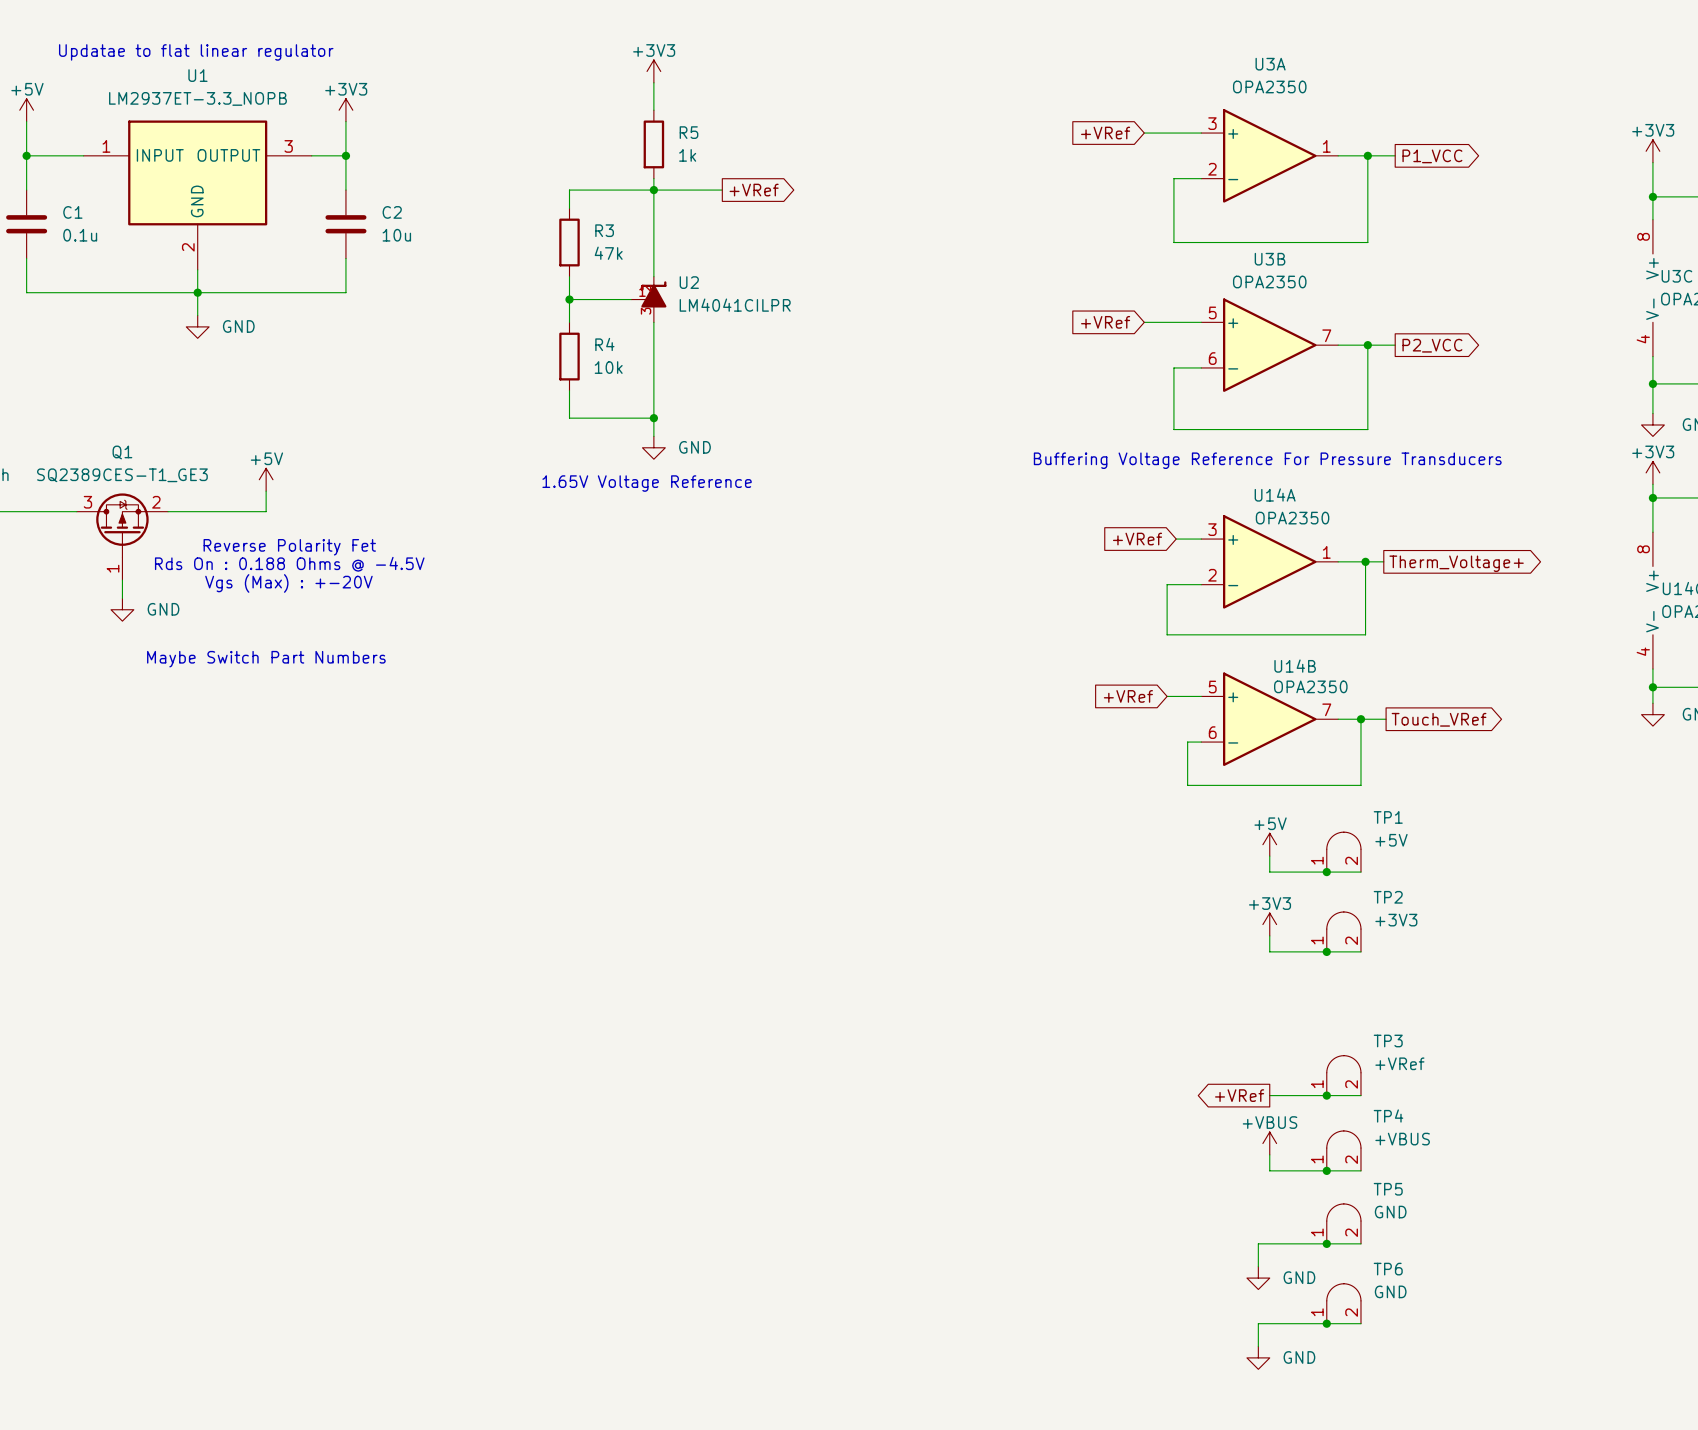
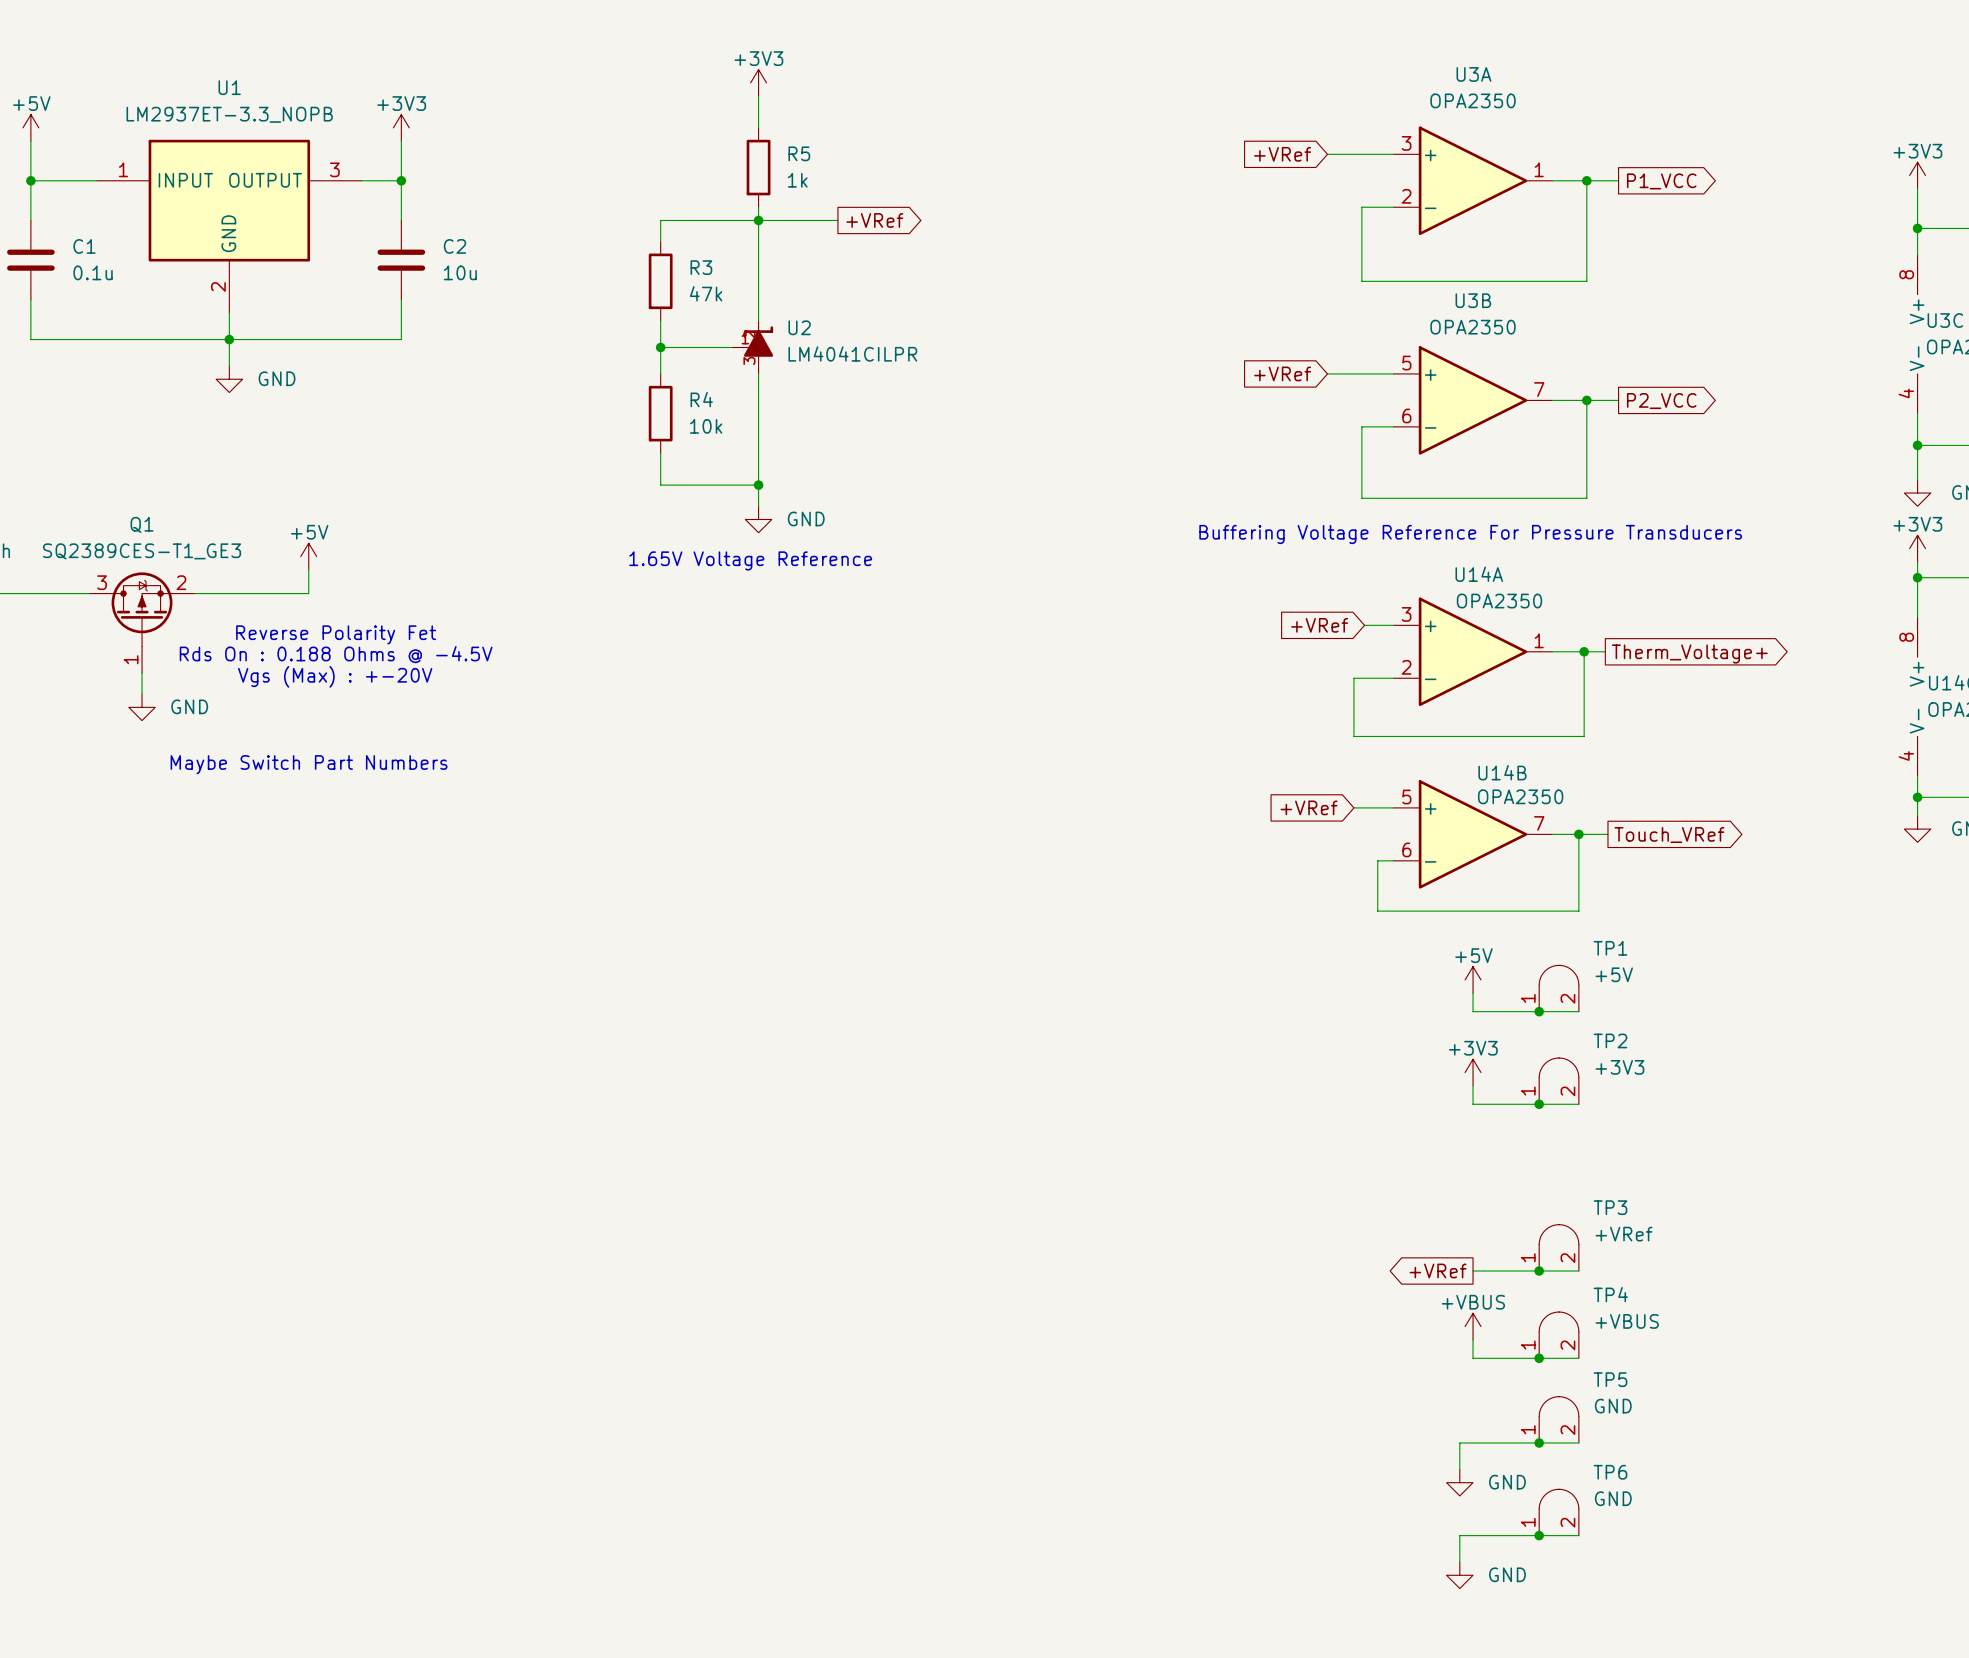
text: Updatae to flat linear regulator (196, 52) -> none

